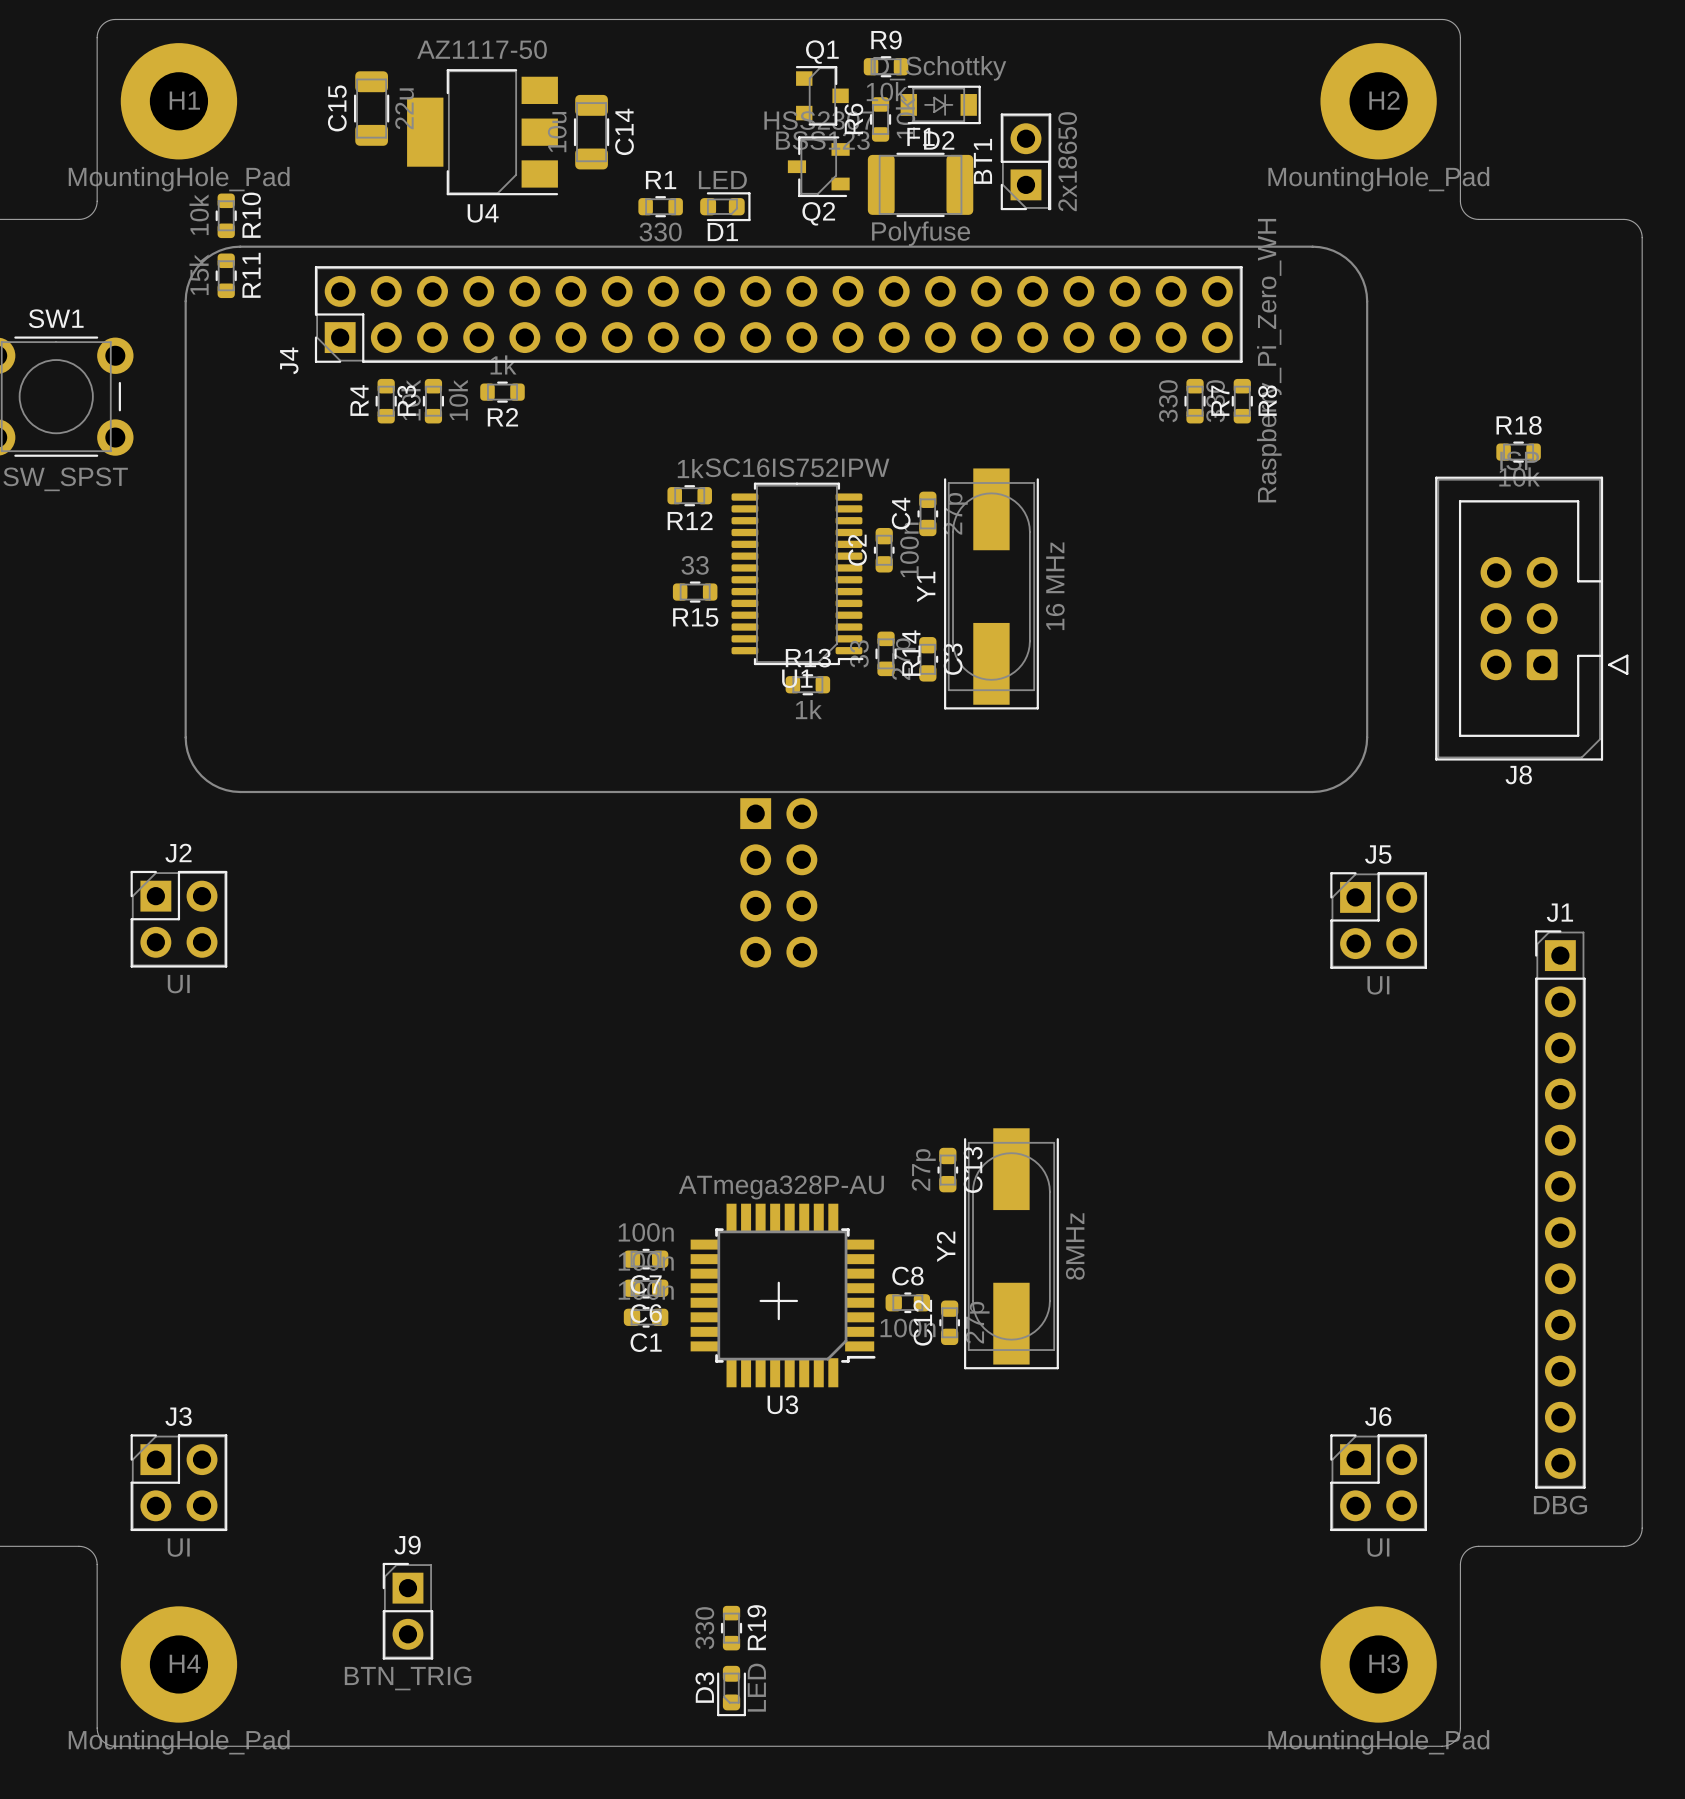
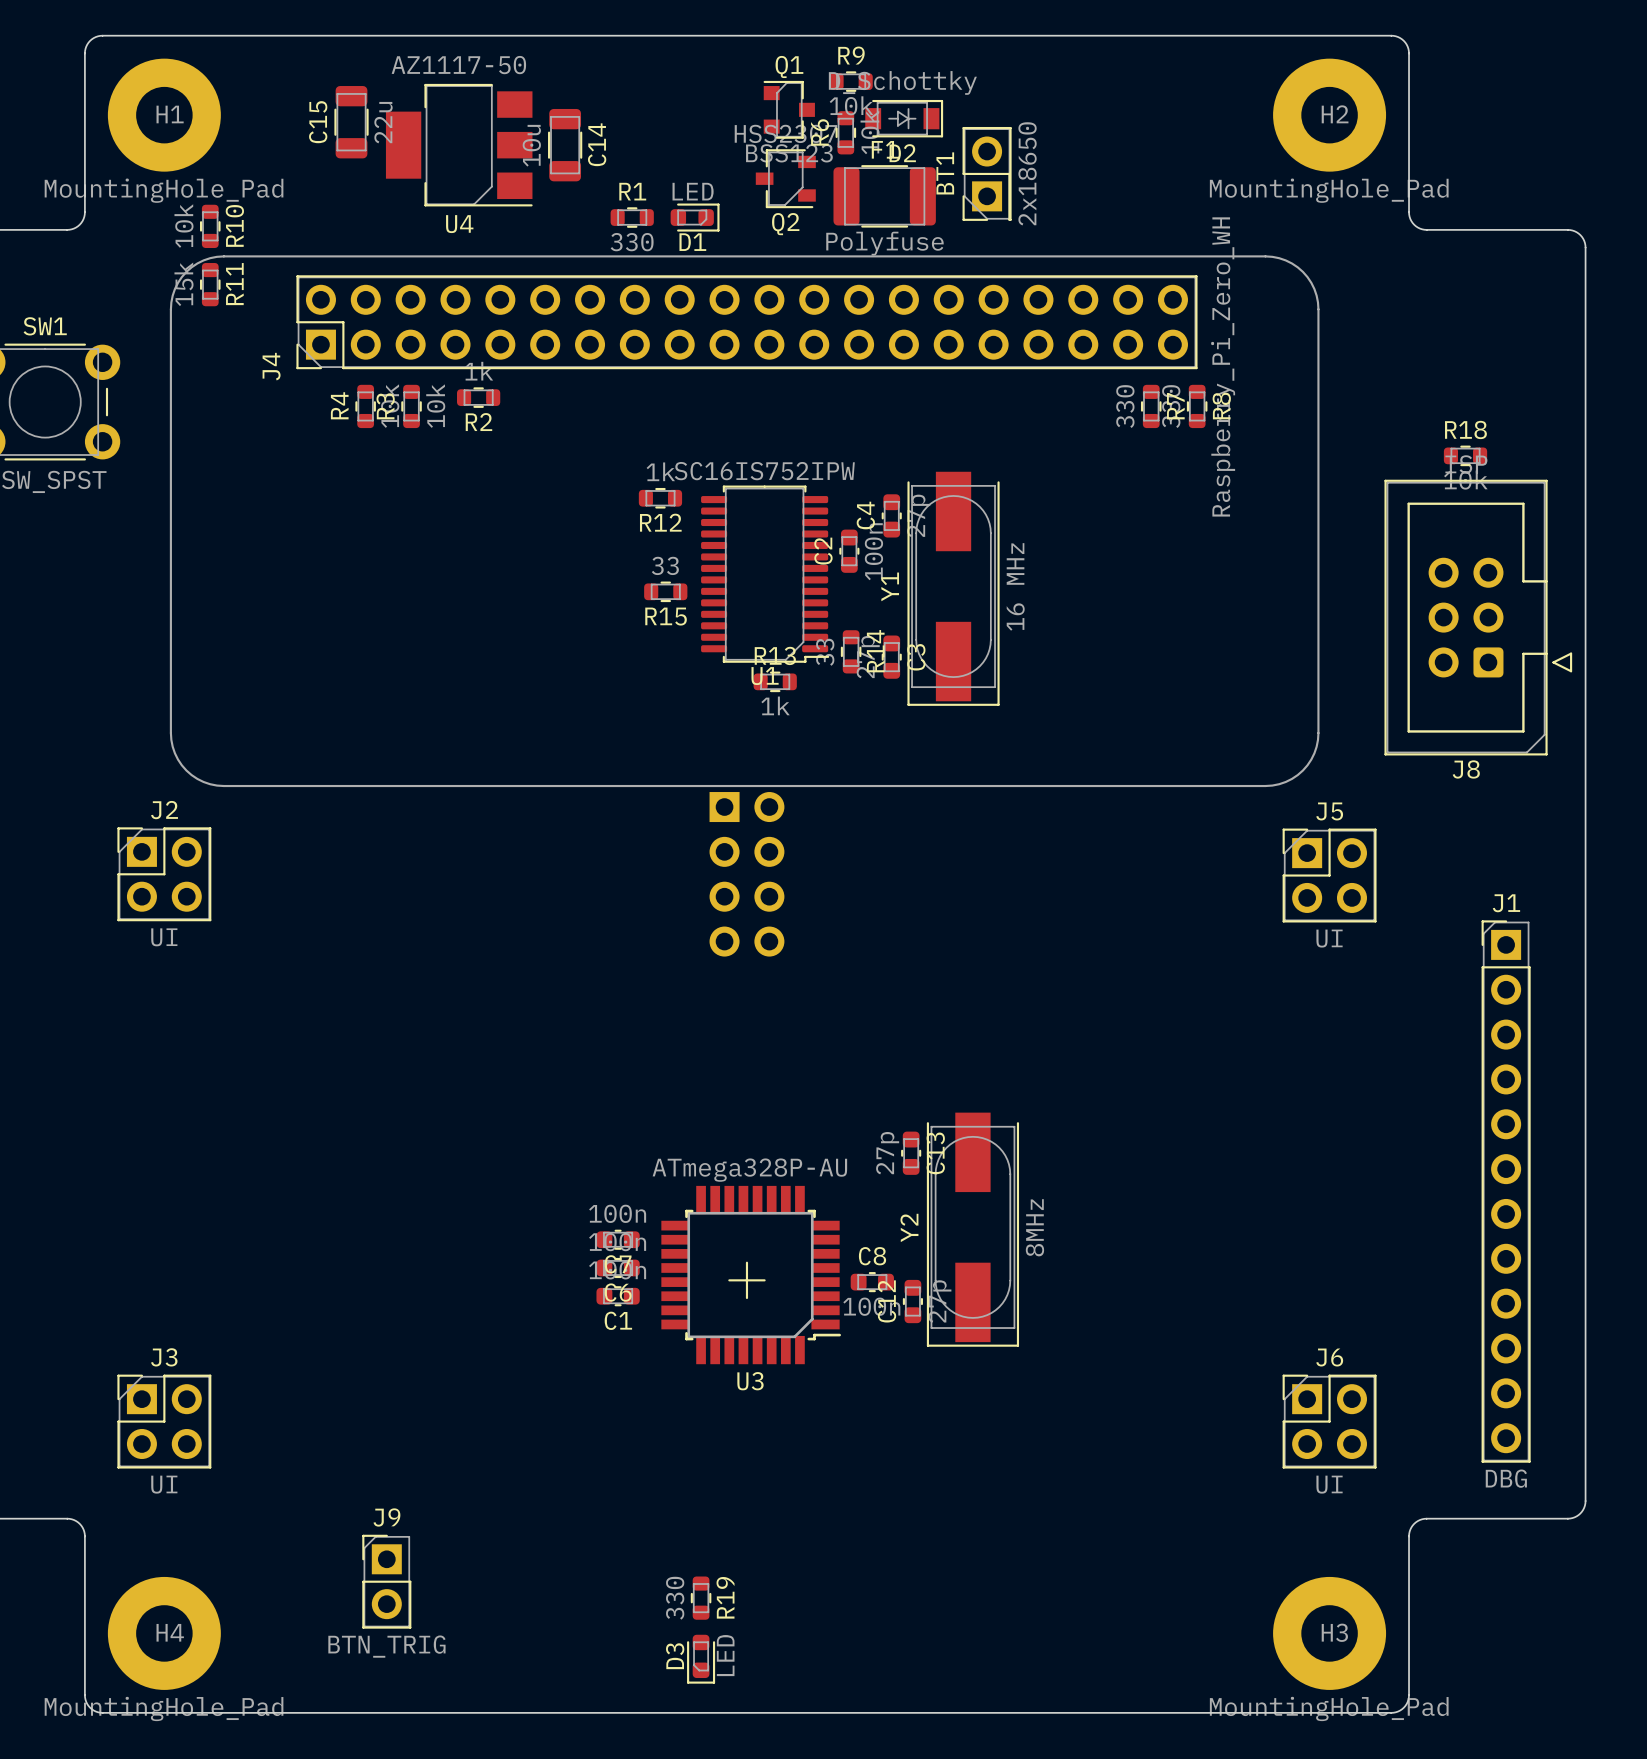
J2 position: (178, 919) -> (164, 874)
J5 position: (1378, 920) -> (1329, 875)
J3 position: (178, 1482) -> (164, 1421)
J6 position: (1378, 1482) -> (1329, 1421)

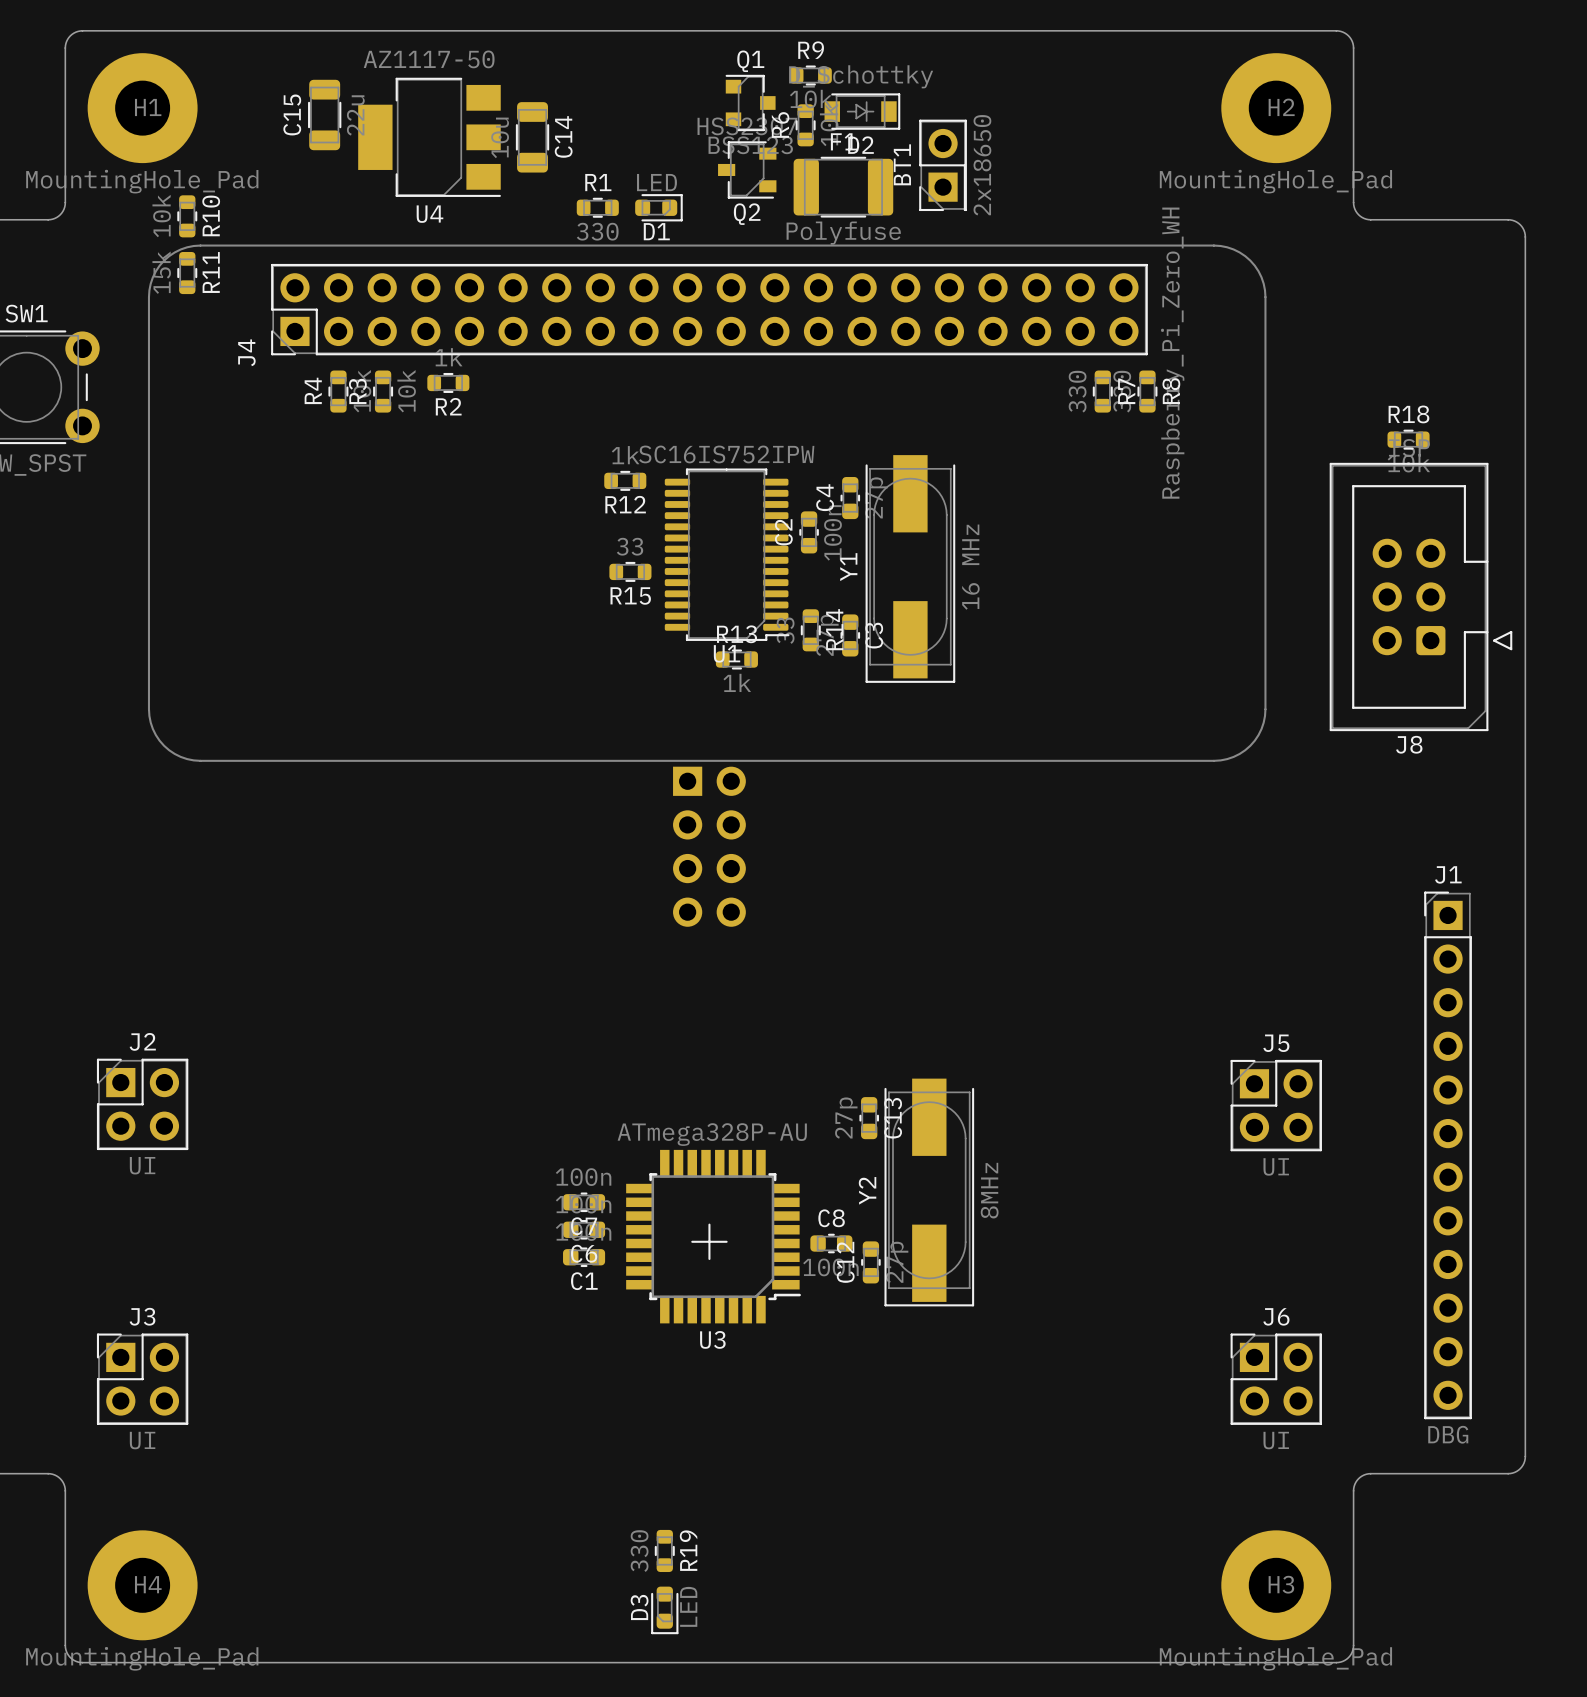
J2 position: (164, 874) -> (142, 1104)
J5 position: (1329, 875) -> (1276, 1105)
J9: BTN_TRIG (386, 1581) -> none

